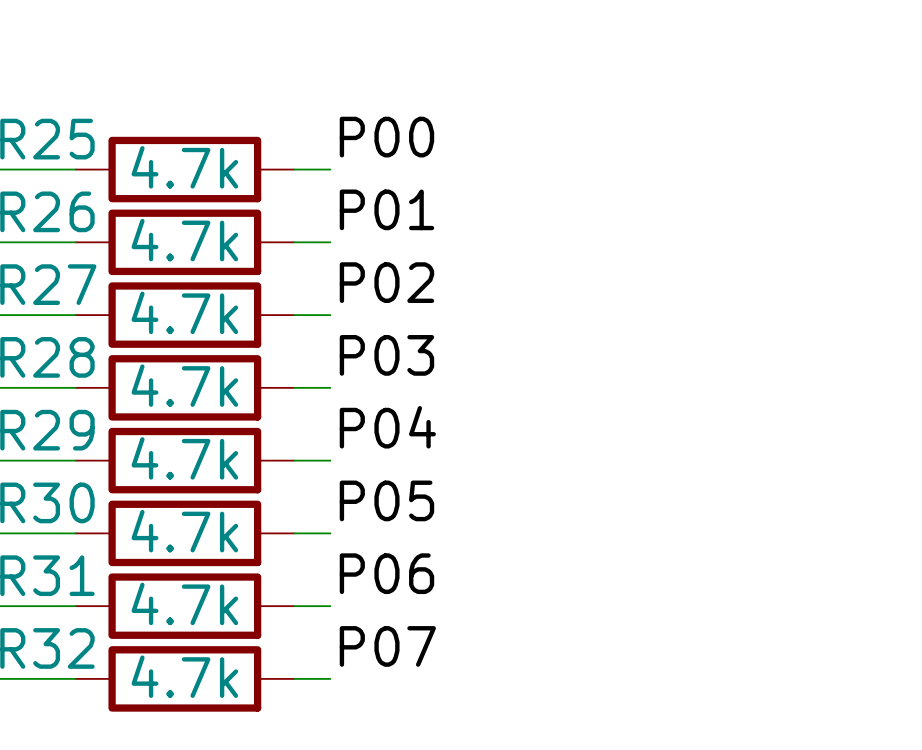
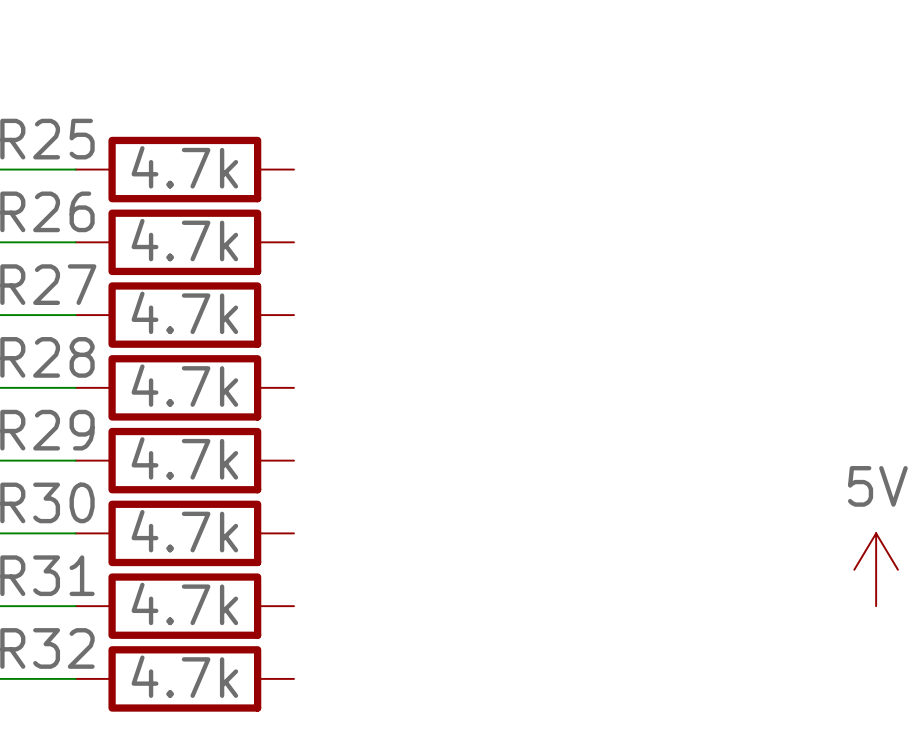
label: P00 (386, 137) -> none
wire: (294, 169) (330, 169) -> none
label: P01 (386, 209) -> none
wire: (294, 242) (330, 242) -> none
label: P02 (386, 282) -> none
wire: (294, 315) (330, 315) -> none
label: P03 (386, 355) -> none
wire: (294, 387) (330, 387) -> none
label: P04 (387, 427) -> none
wire: (294, 460) (330, 460) -> none
label: P05 (386, 500) -> none
wire: (294, 533) (330, 533) -> none
power symbol: none -> 5V (876, 569)
label: P06 (386, 573) -> none
wire: (294, 606) (330, 606) -> none
label: P07 (387, 646) -> none
wire: (294, 678) (330, 678) -> none

